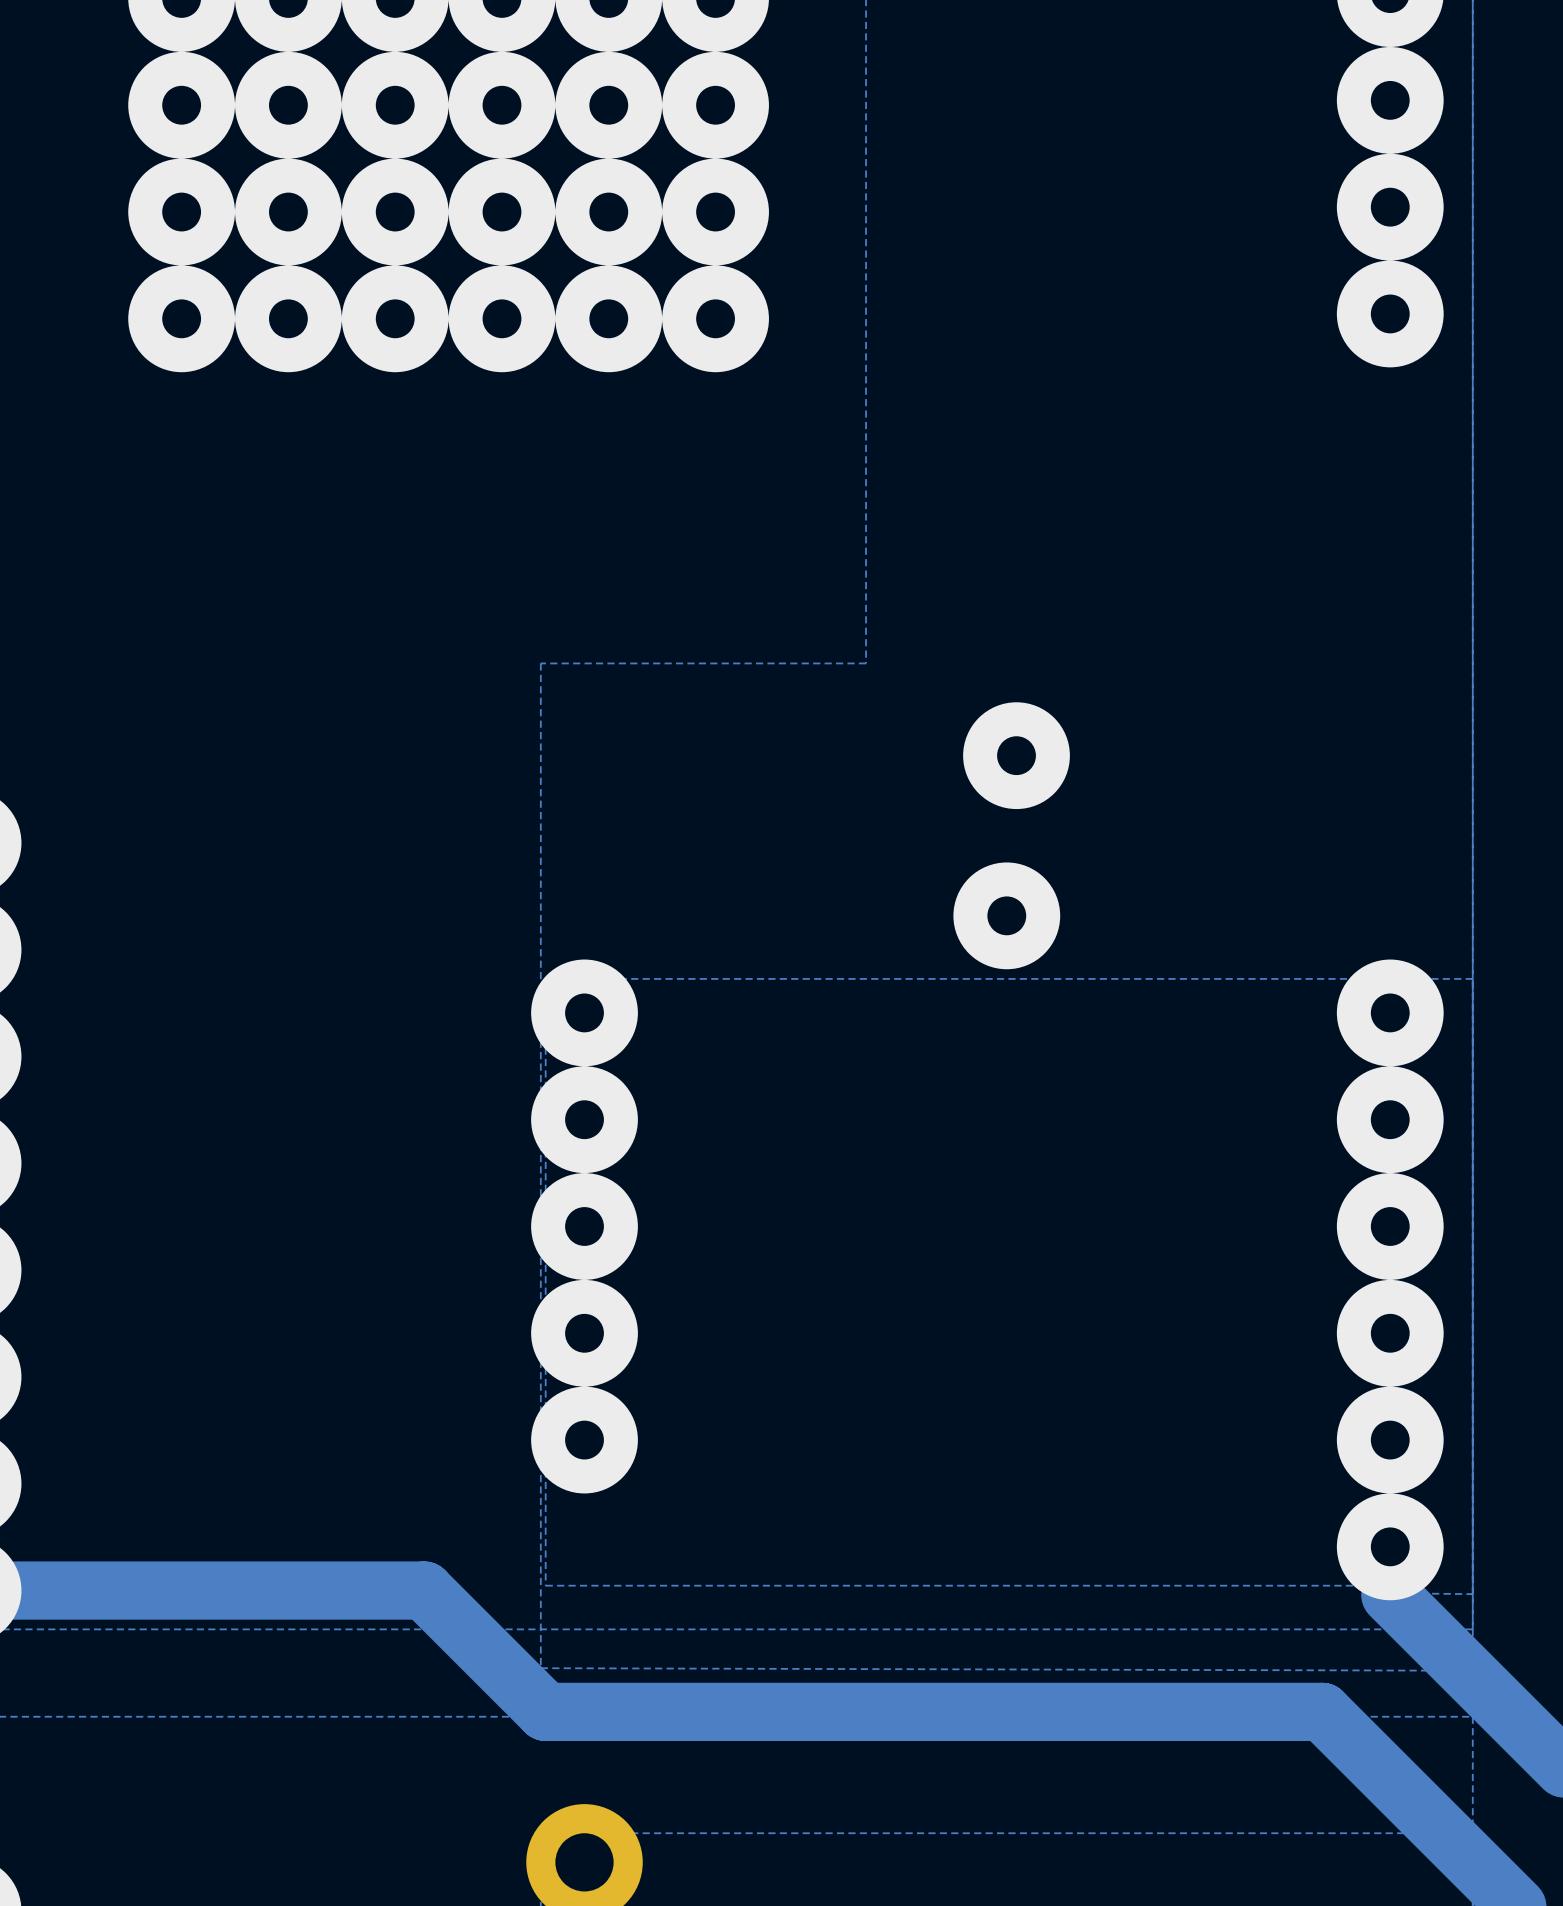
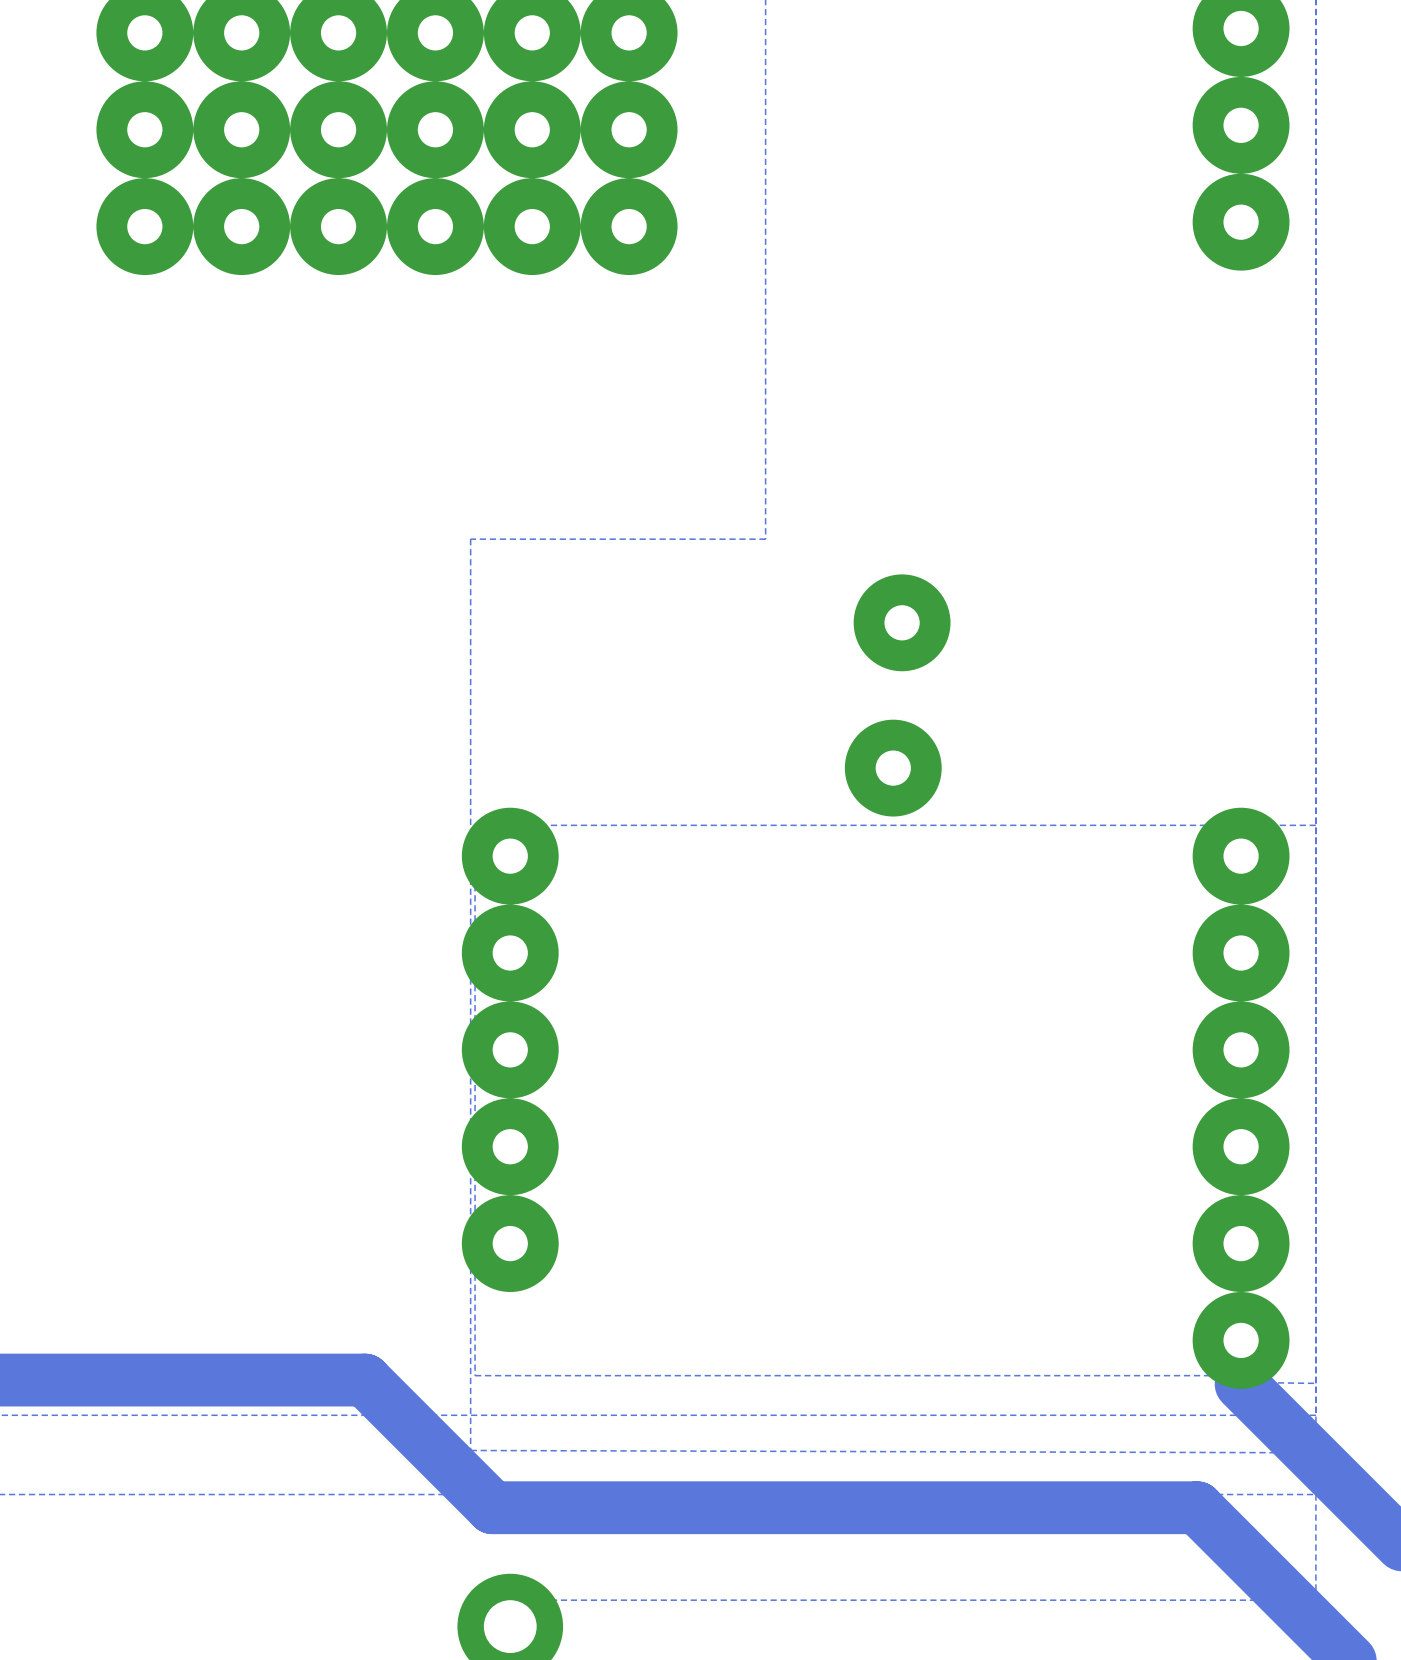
track: (545, 1711) (1322, 1711) (1341, 1731) -> (475, 1490) (492, 1507) (1197, 1507)

